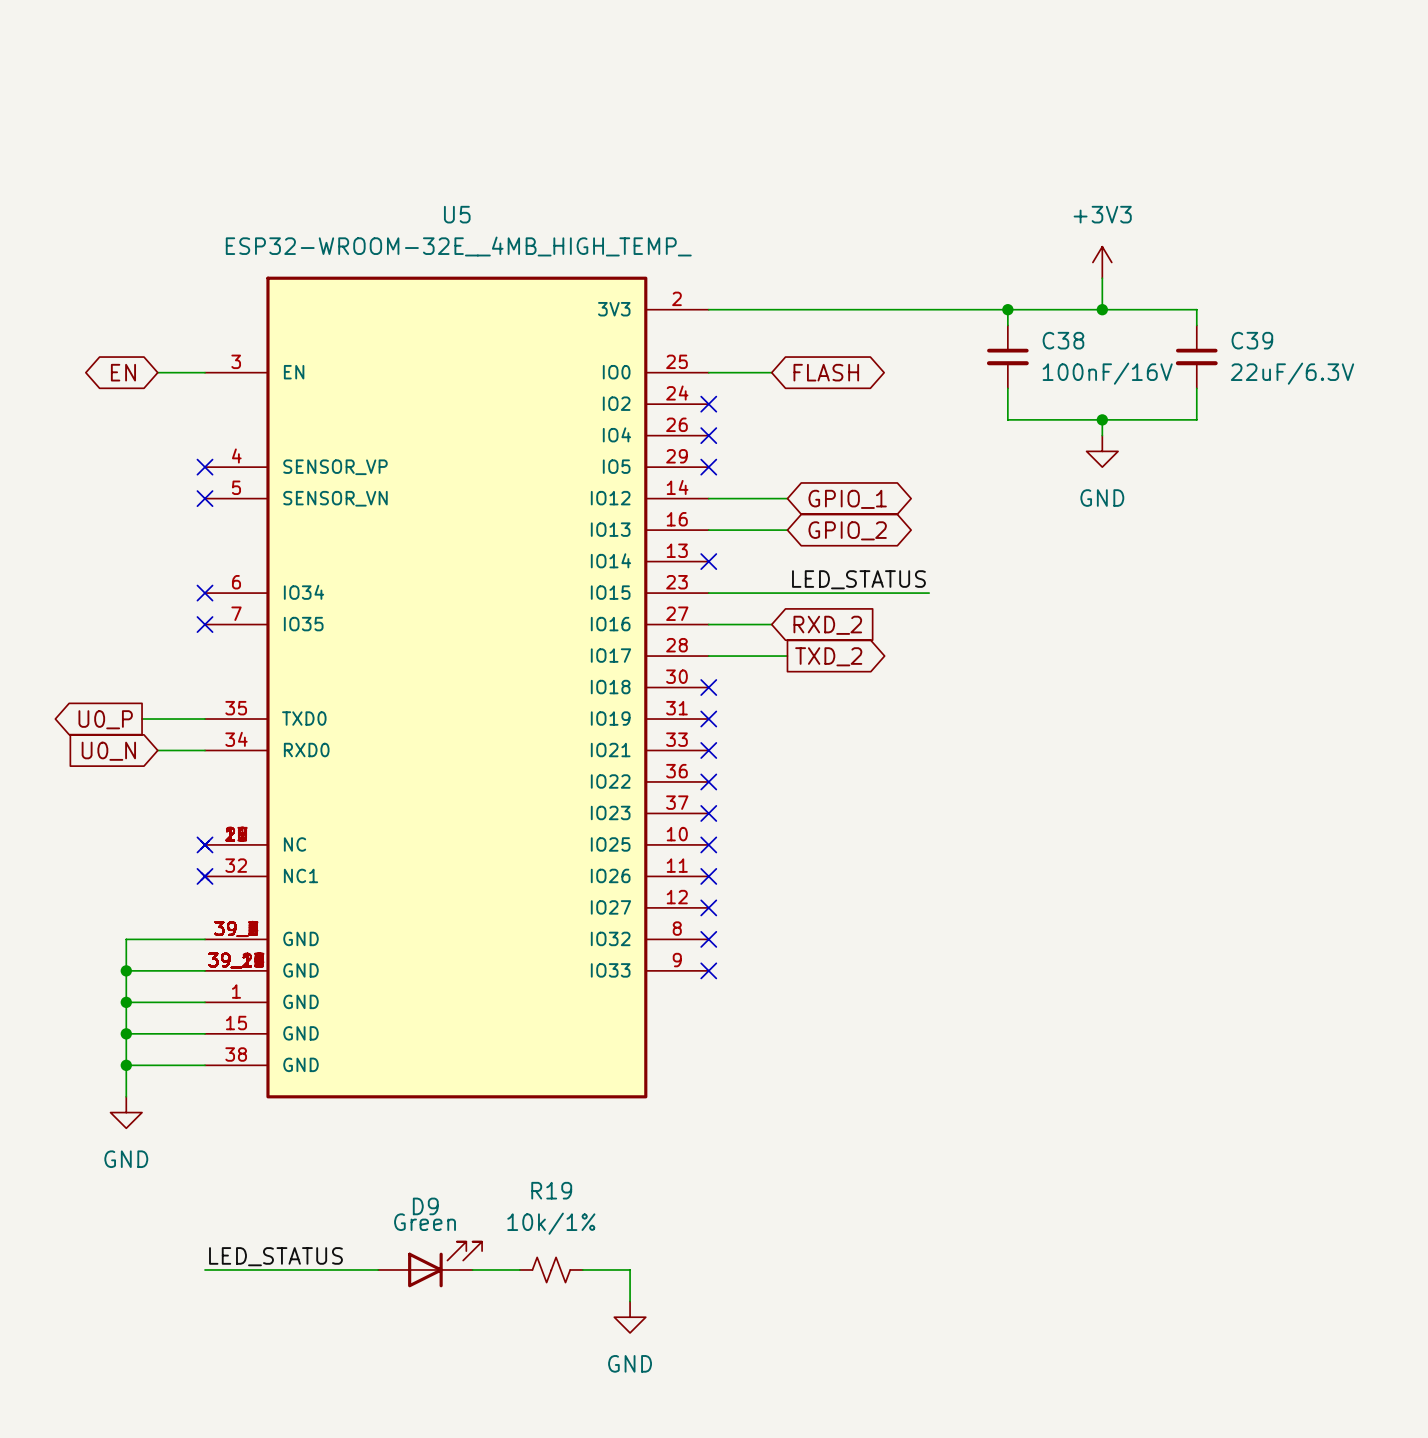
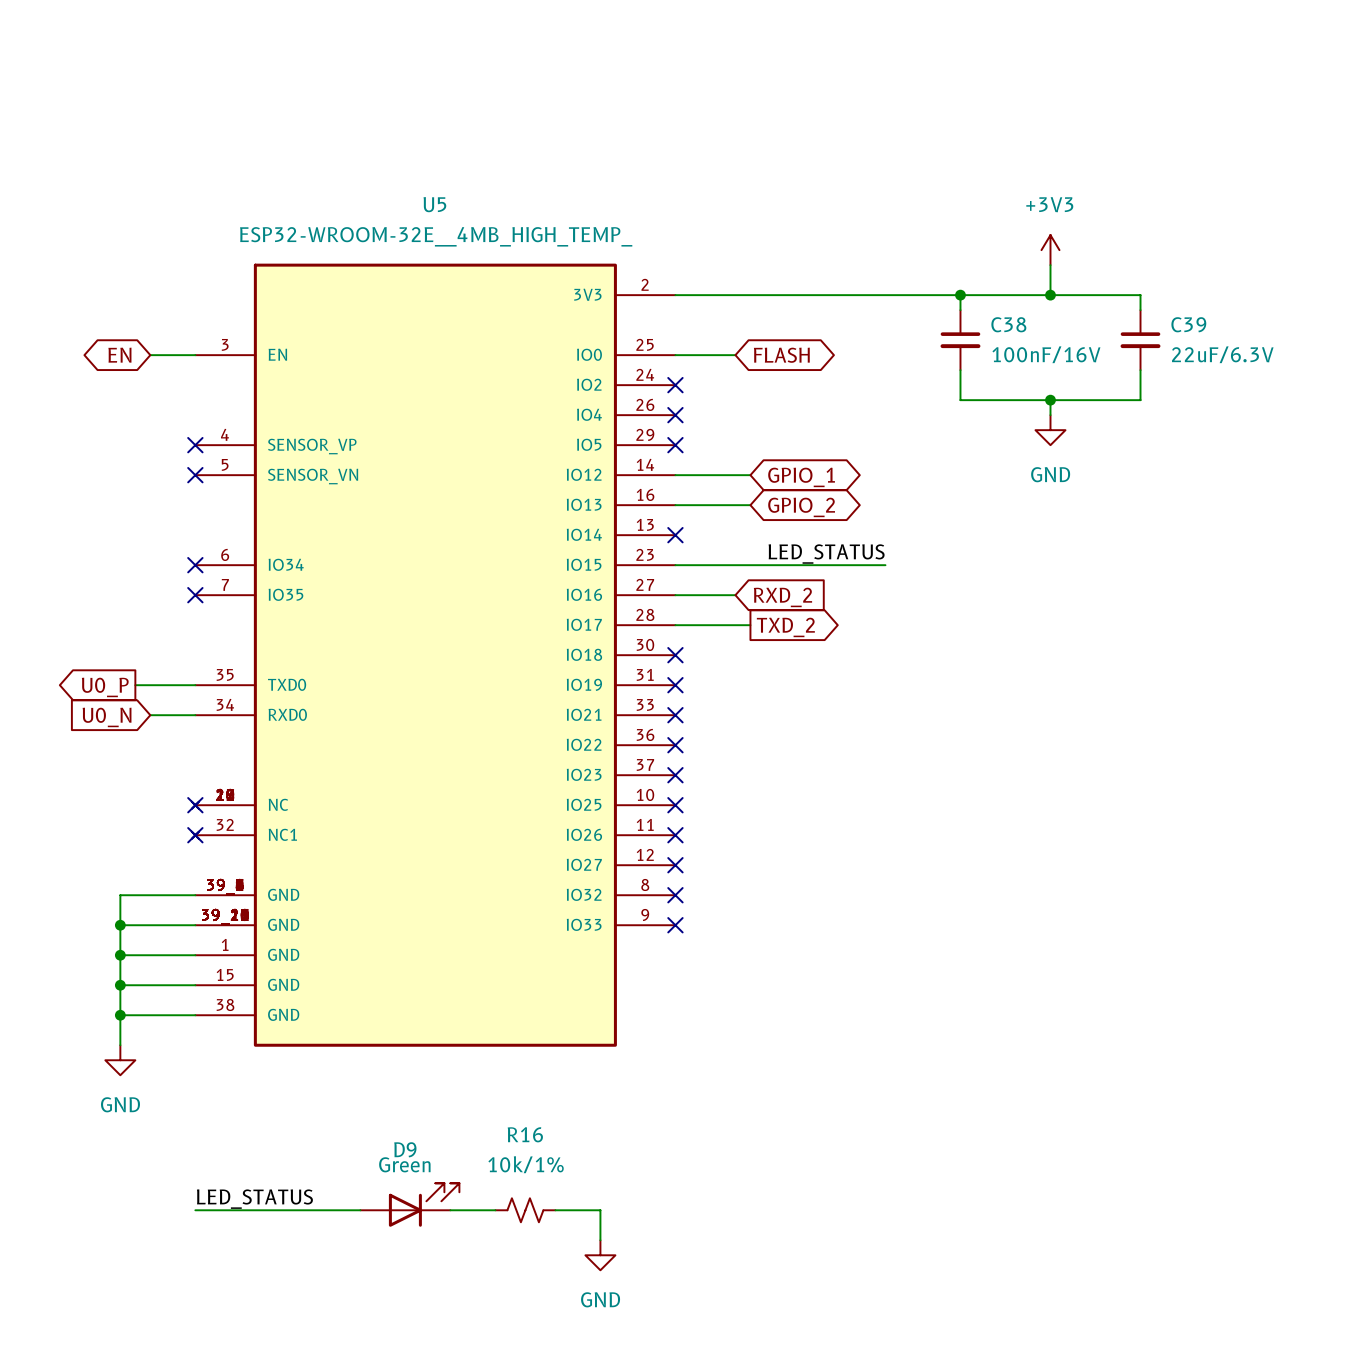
R19 name: R19 (551, 1190) -> R16 (525, 1134)

